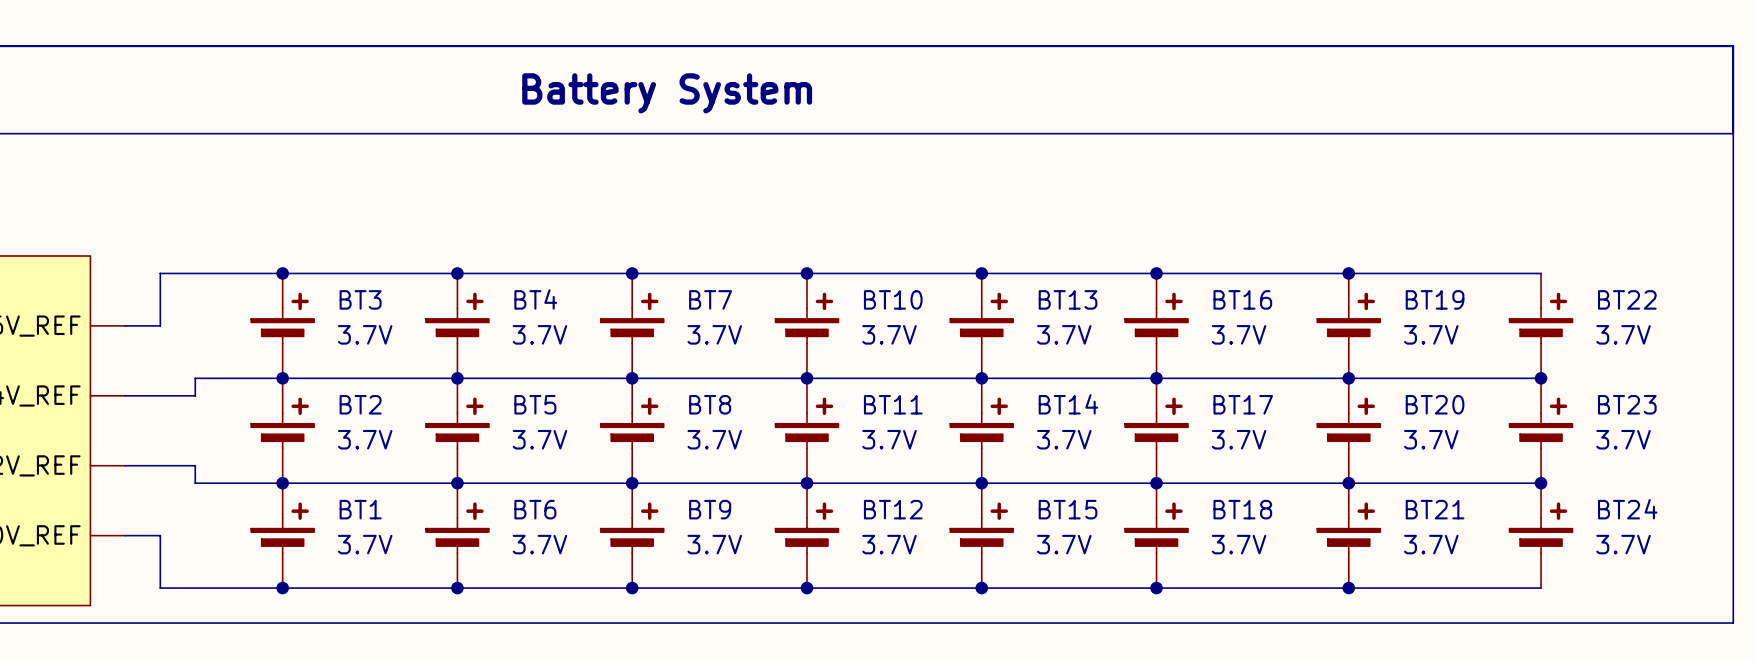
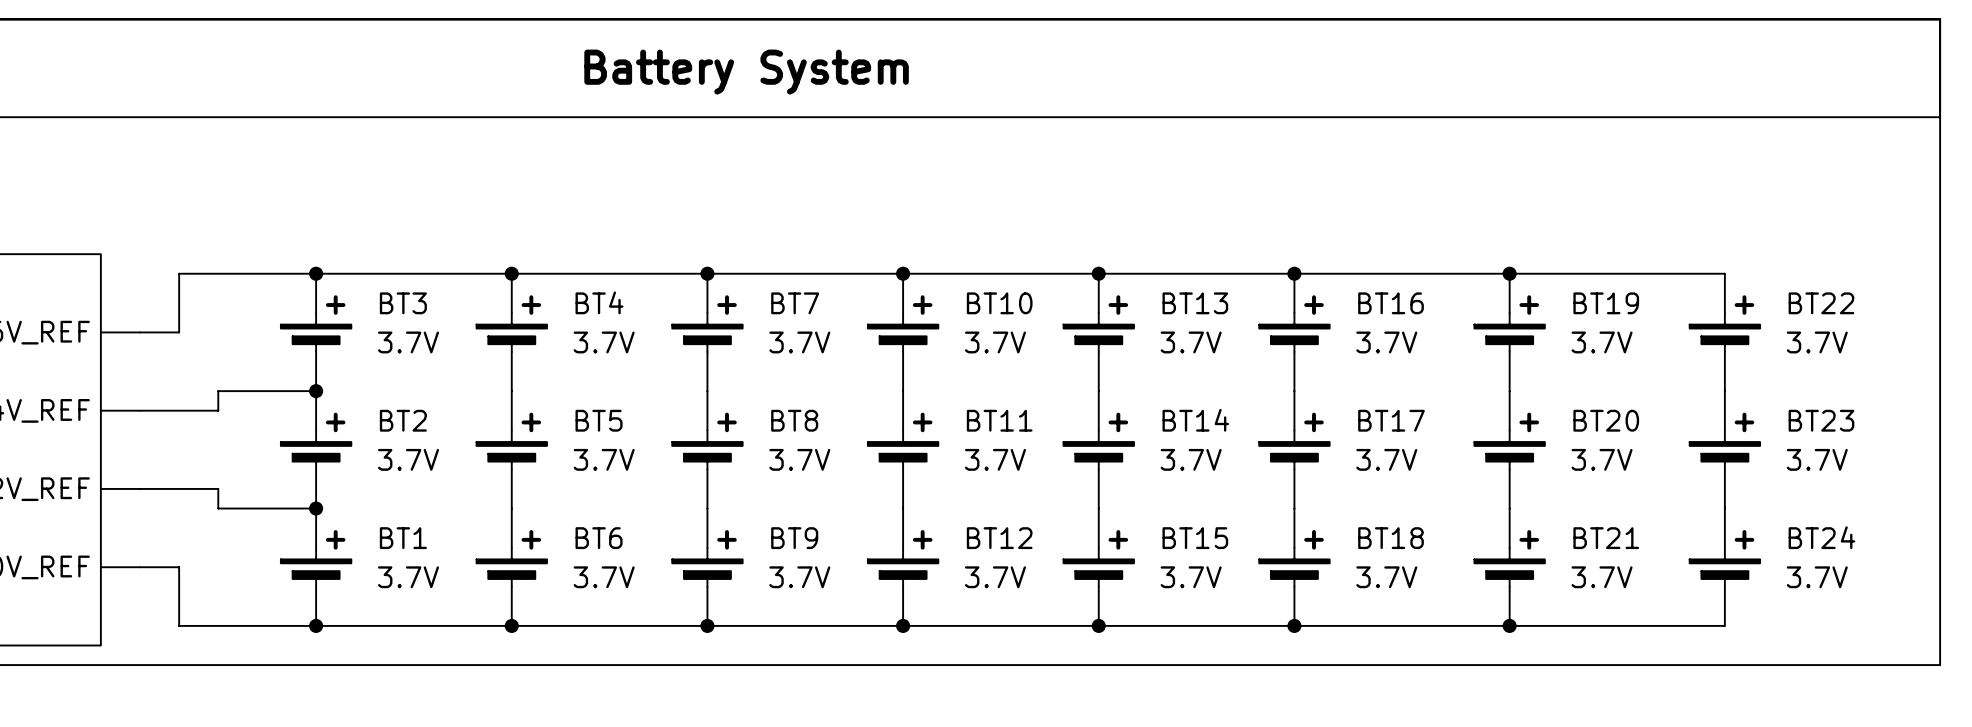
wire: (282, 378) (1541, 378) -> none
junction: (457, 378) -> none
junction: (632, 378) -> none
junction: (806, 378) -> none
junction: (981, 378) -> none
junction: (1156, 378) -> none
junction: (1348, 378) -> none
junction: (1541, 378) -> none
wire: (282, 483) (1541, 483) -> none
junction: (457, 483) -> none
junction: (632, 483) -> none
junction: (806, 483) -> none
junction: (981, 483) -> none
junction: (1156, 483) -> none
junction: (1348, 483) -> none
junction: (1541, 483) -> none

